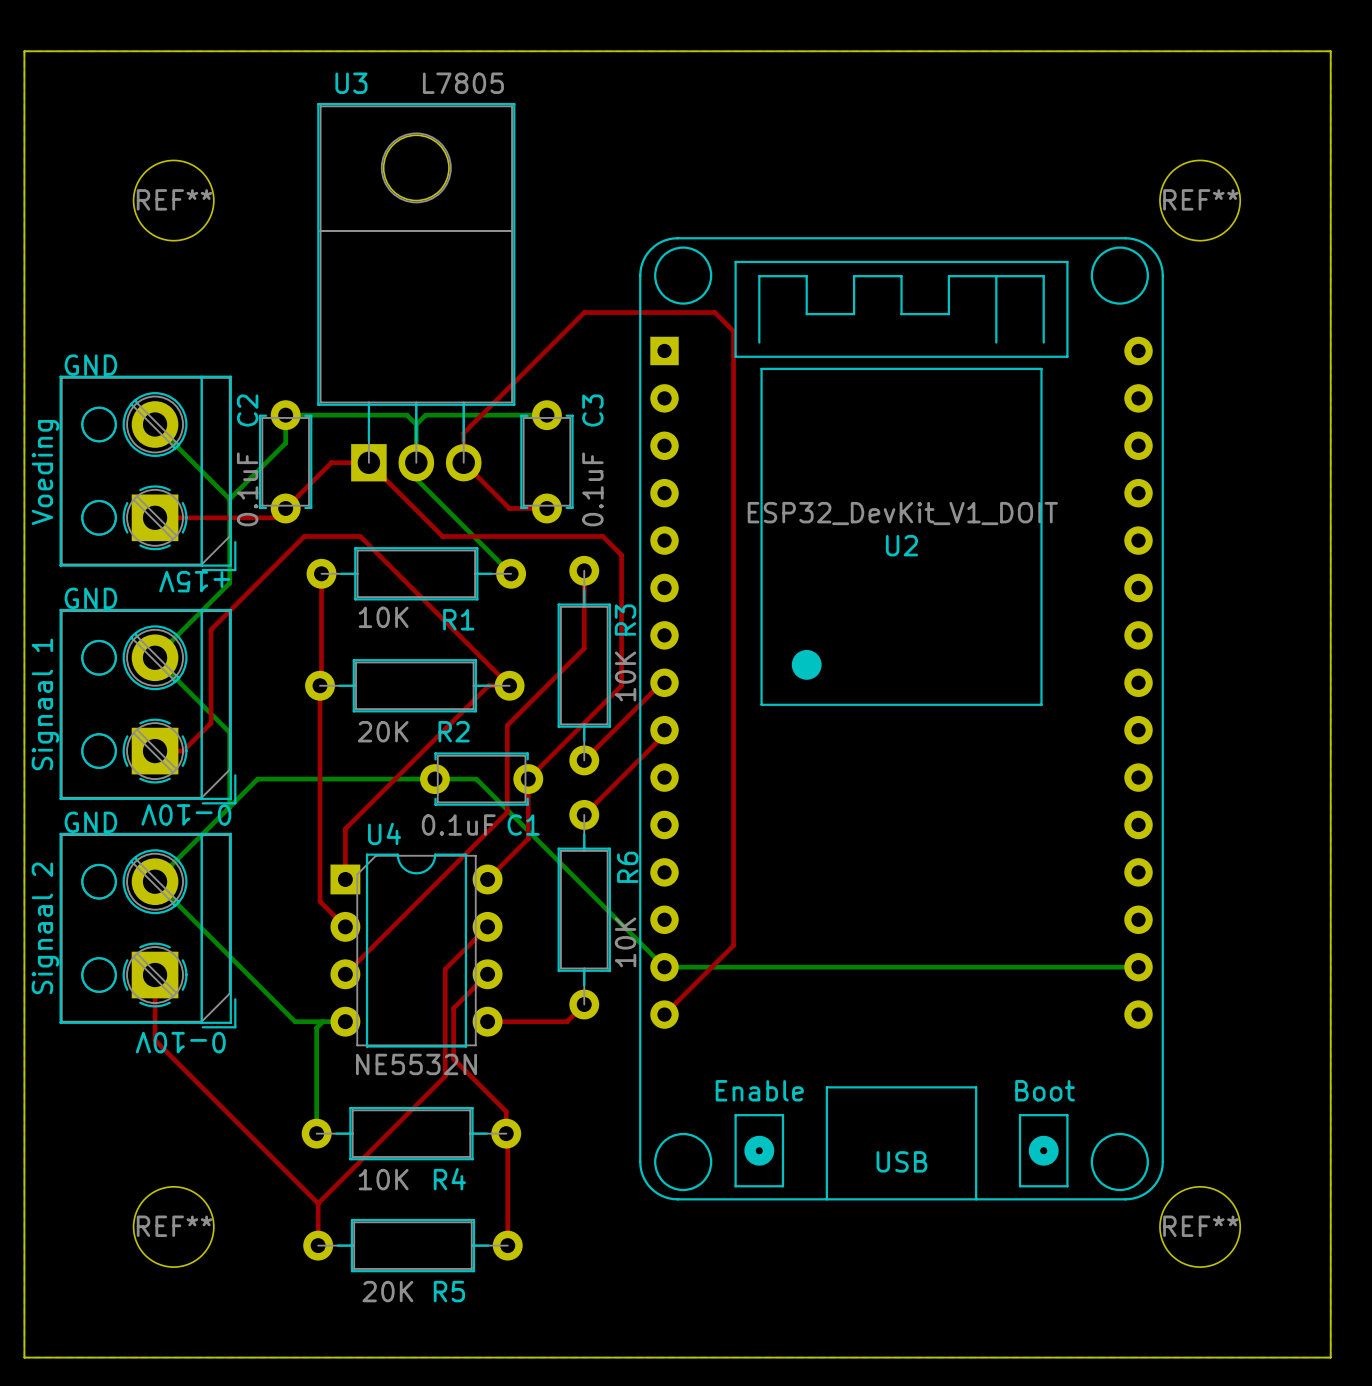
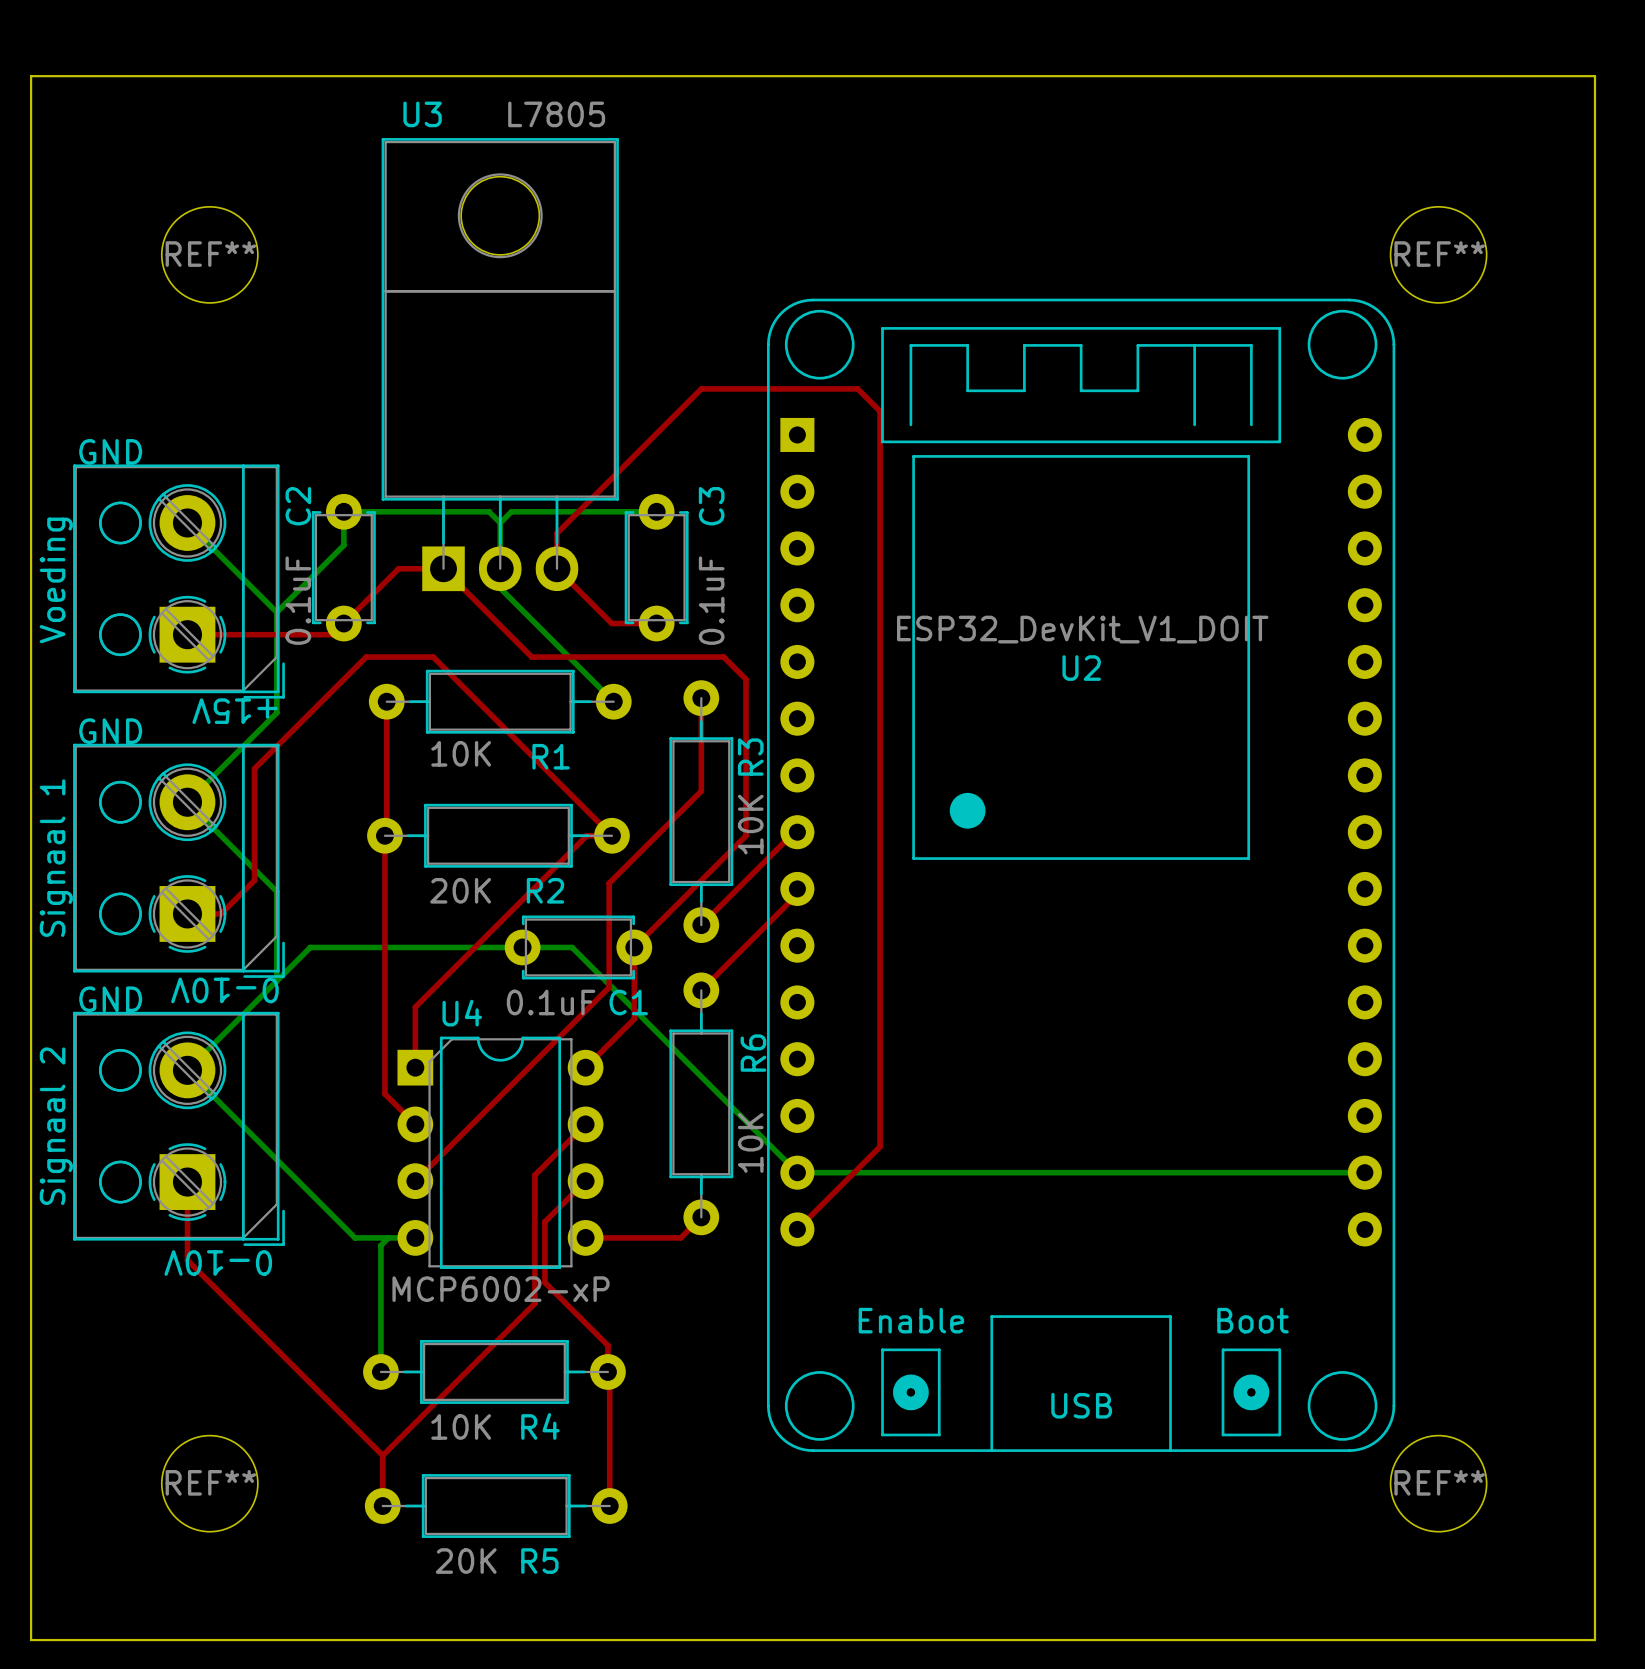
U4 value: NE5532N (416, 1064) -> MCP6002-xP (501, 1289)

